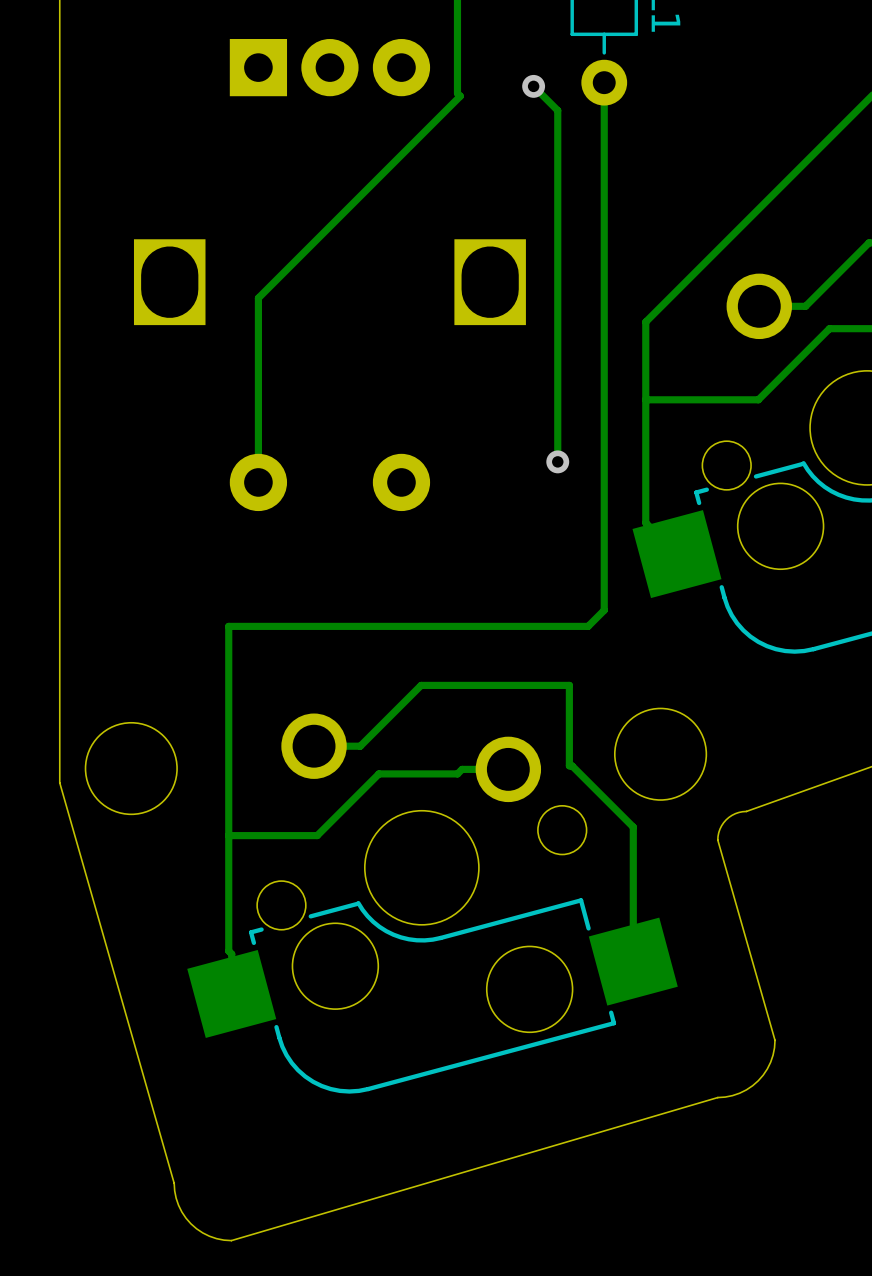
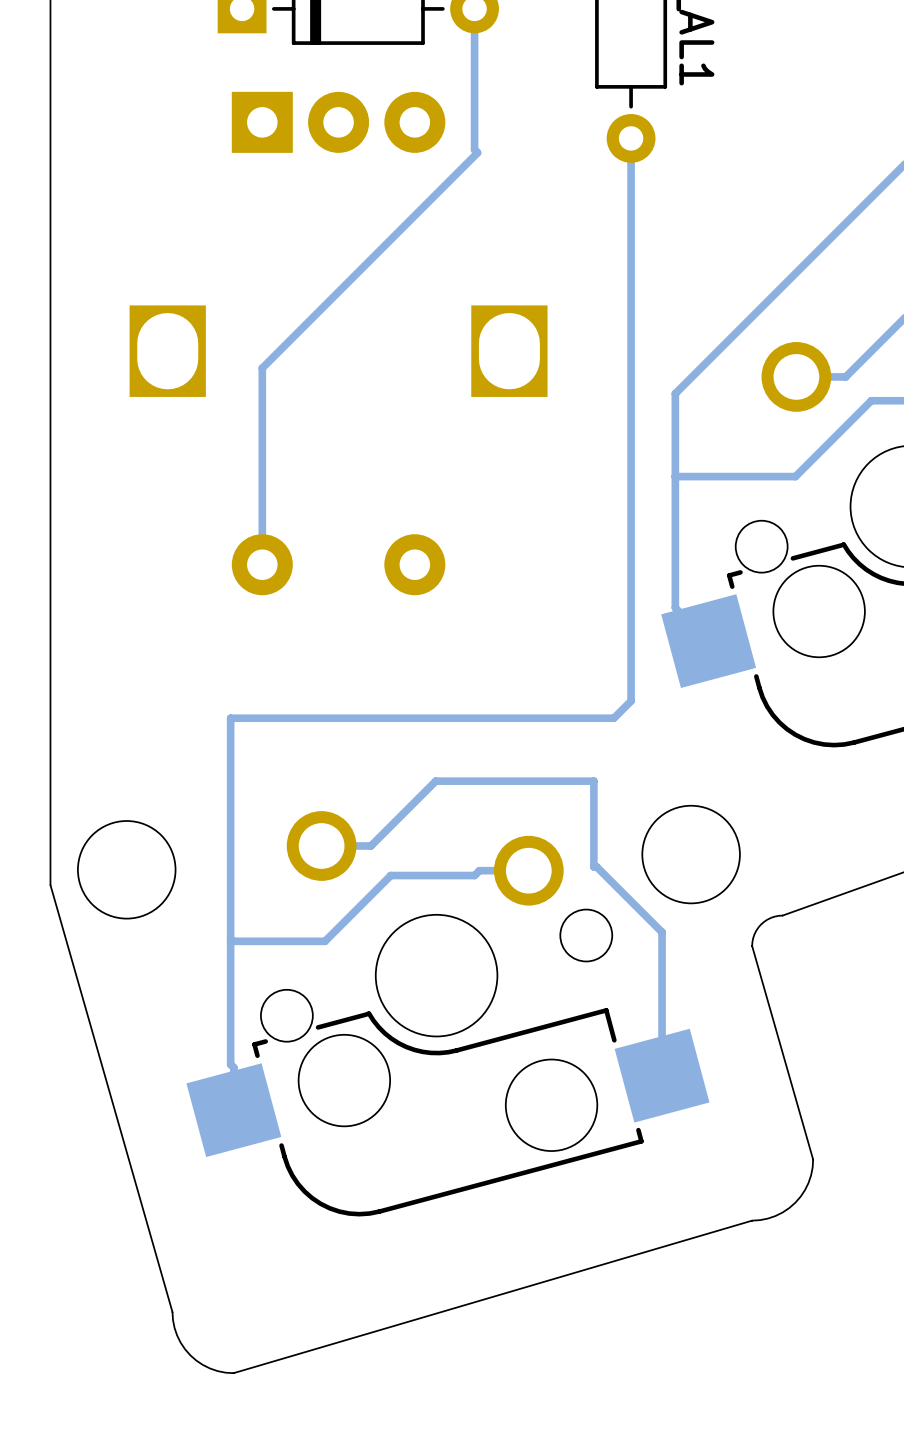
track: (533, 86) (557, 110) (557, 461) -> none
via: (533, 86) -> none
via: (557, 461) -> none

